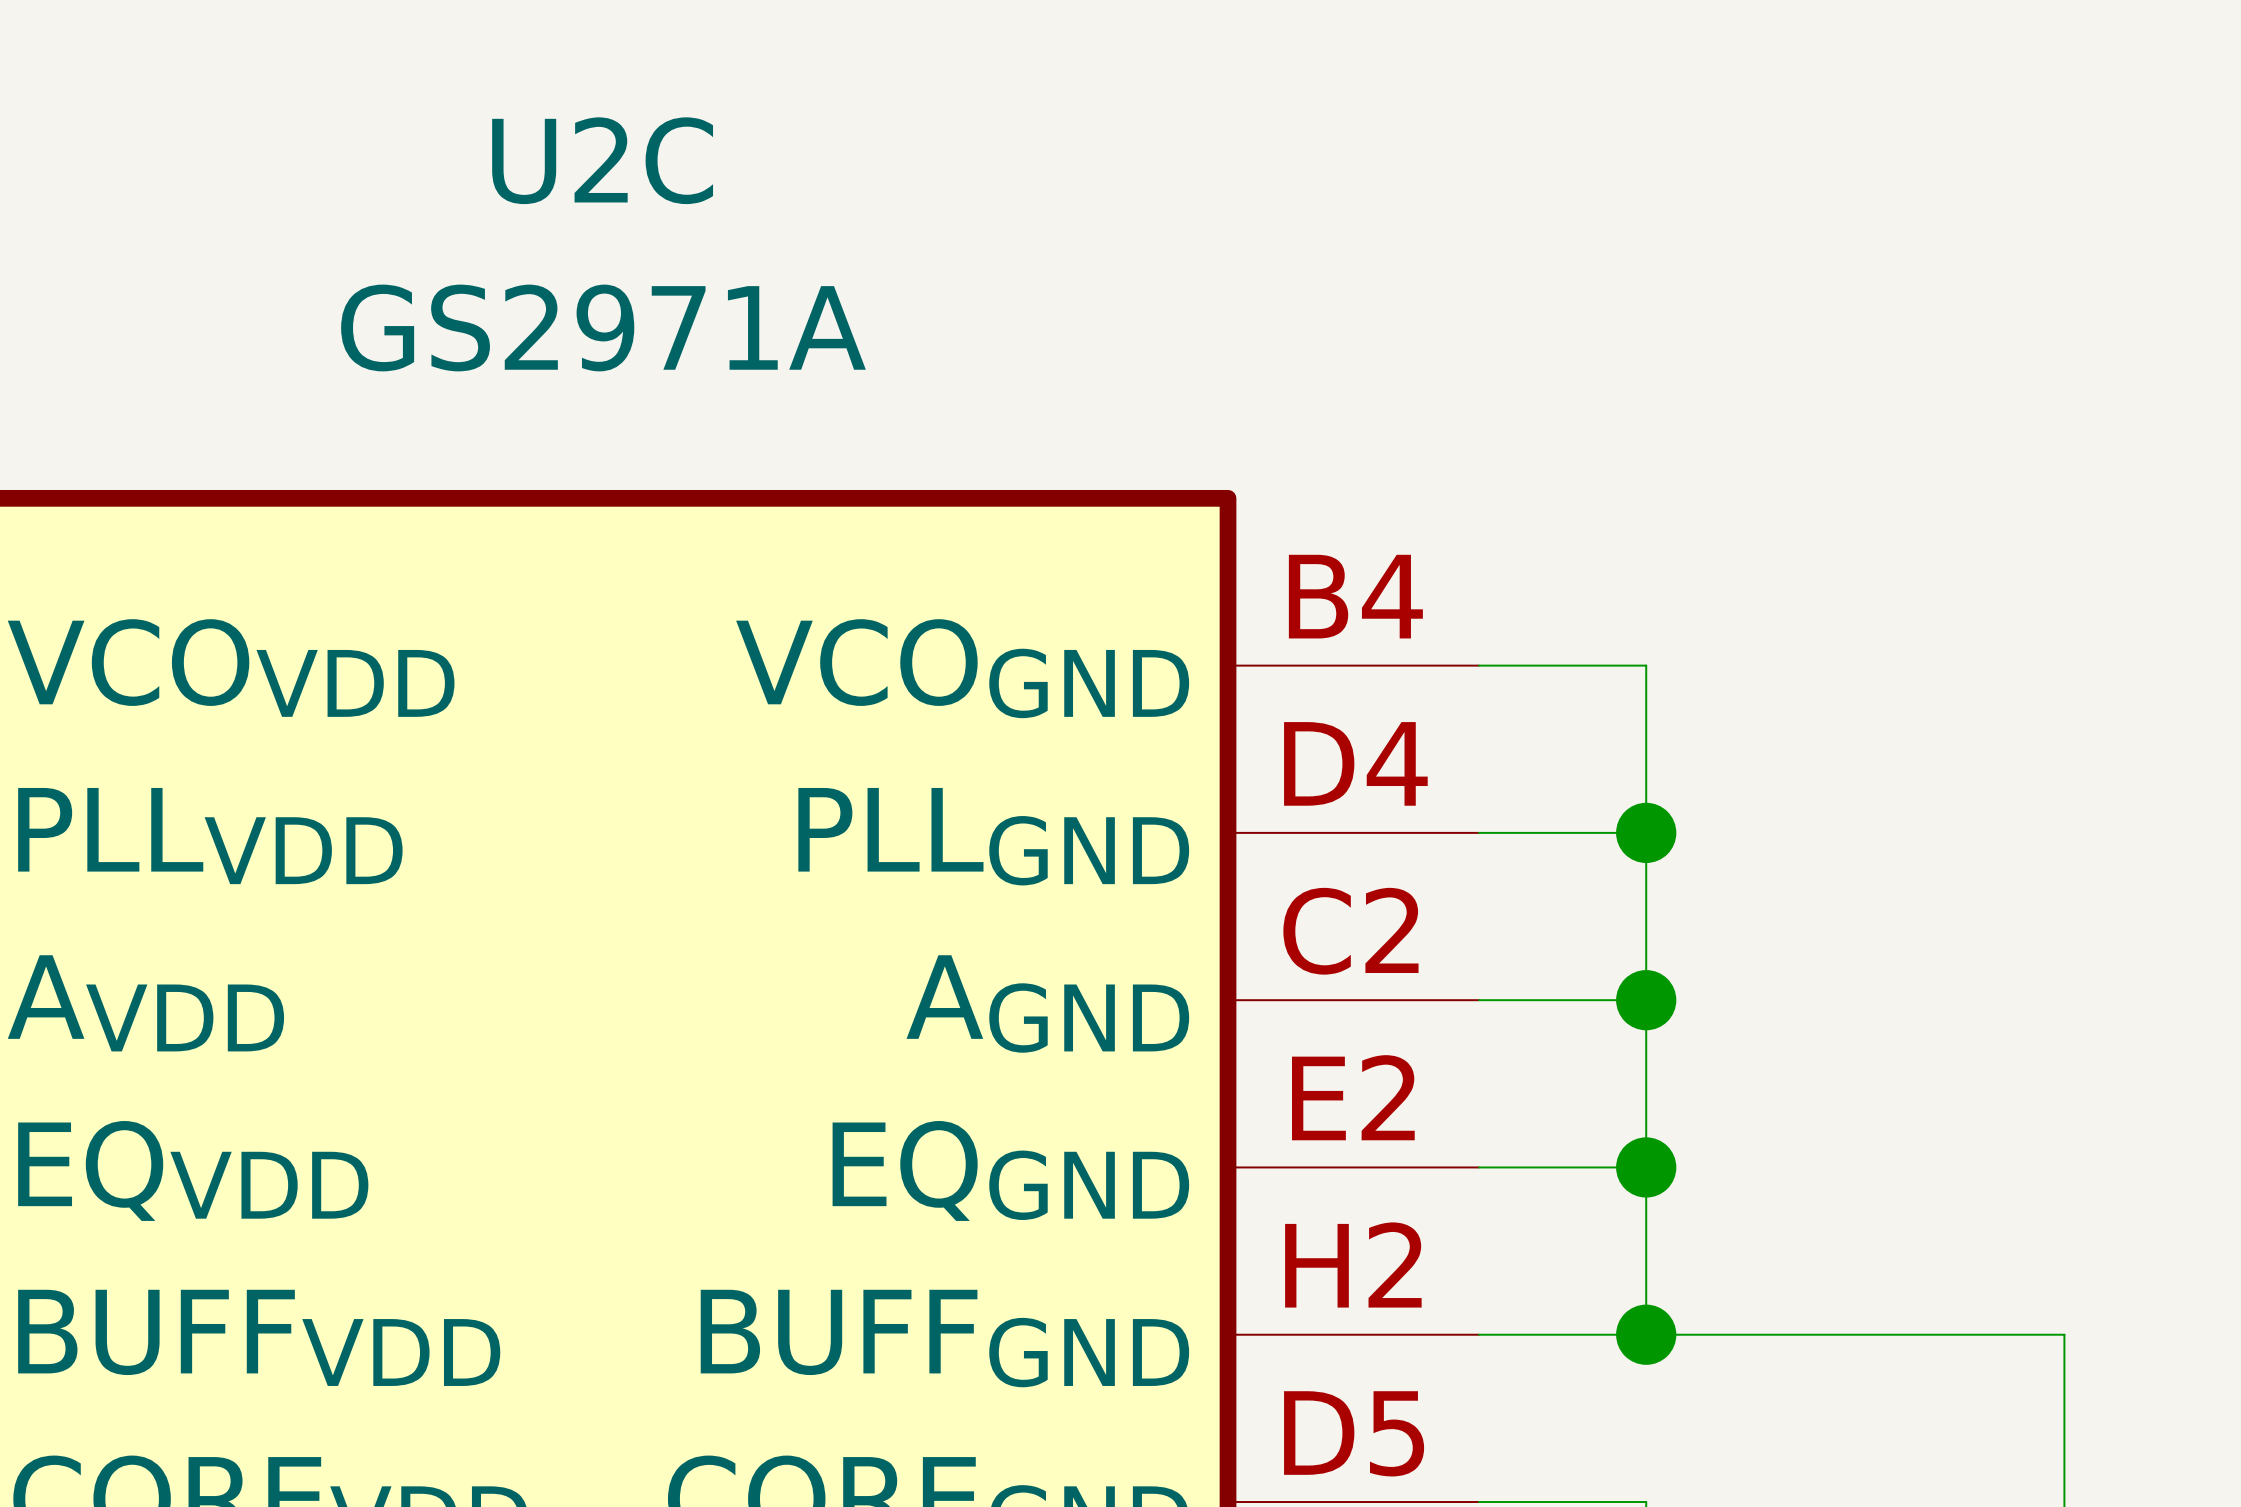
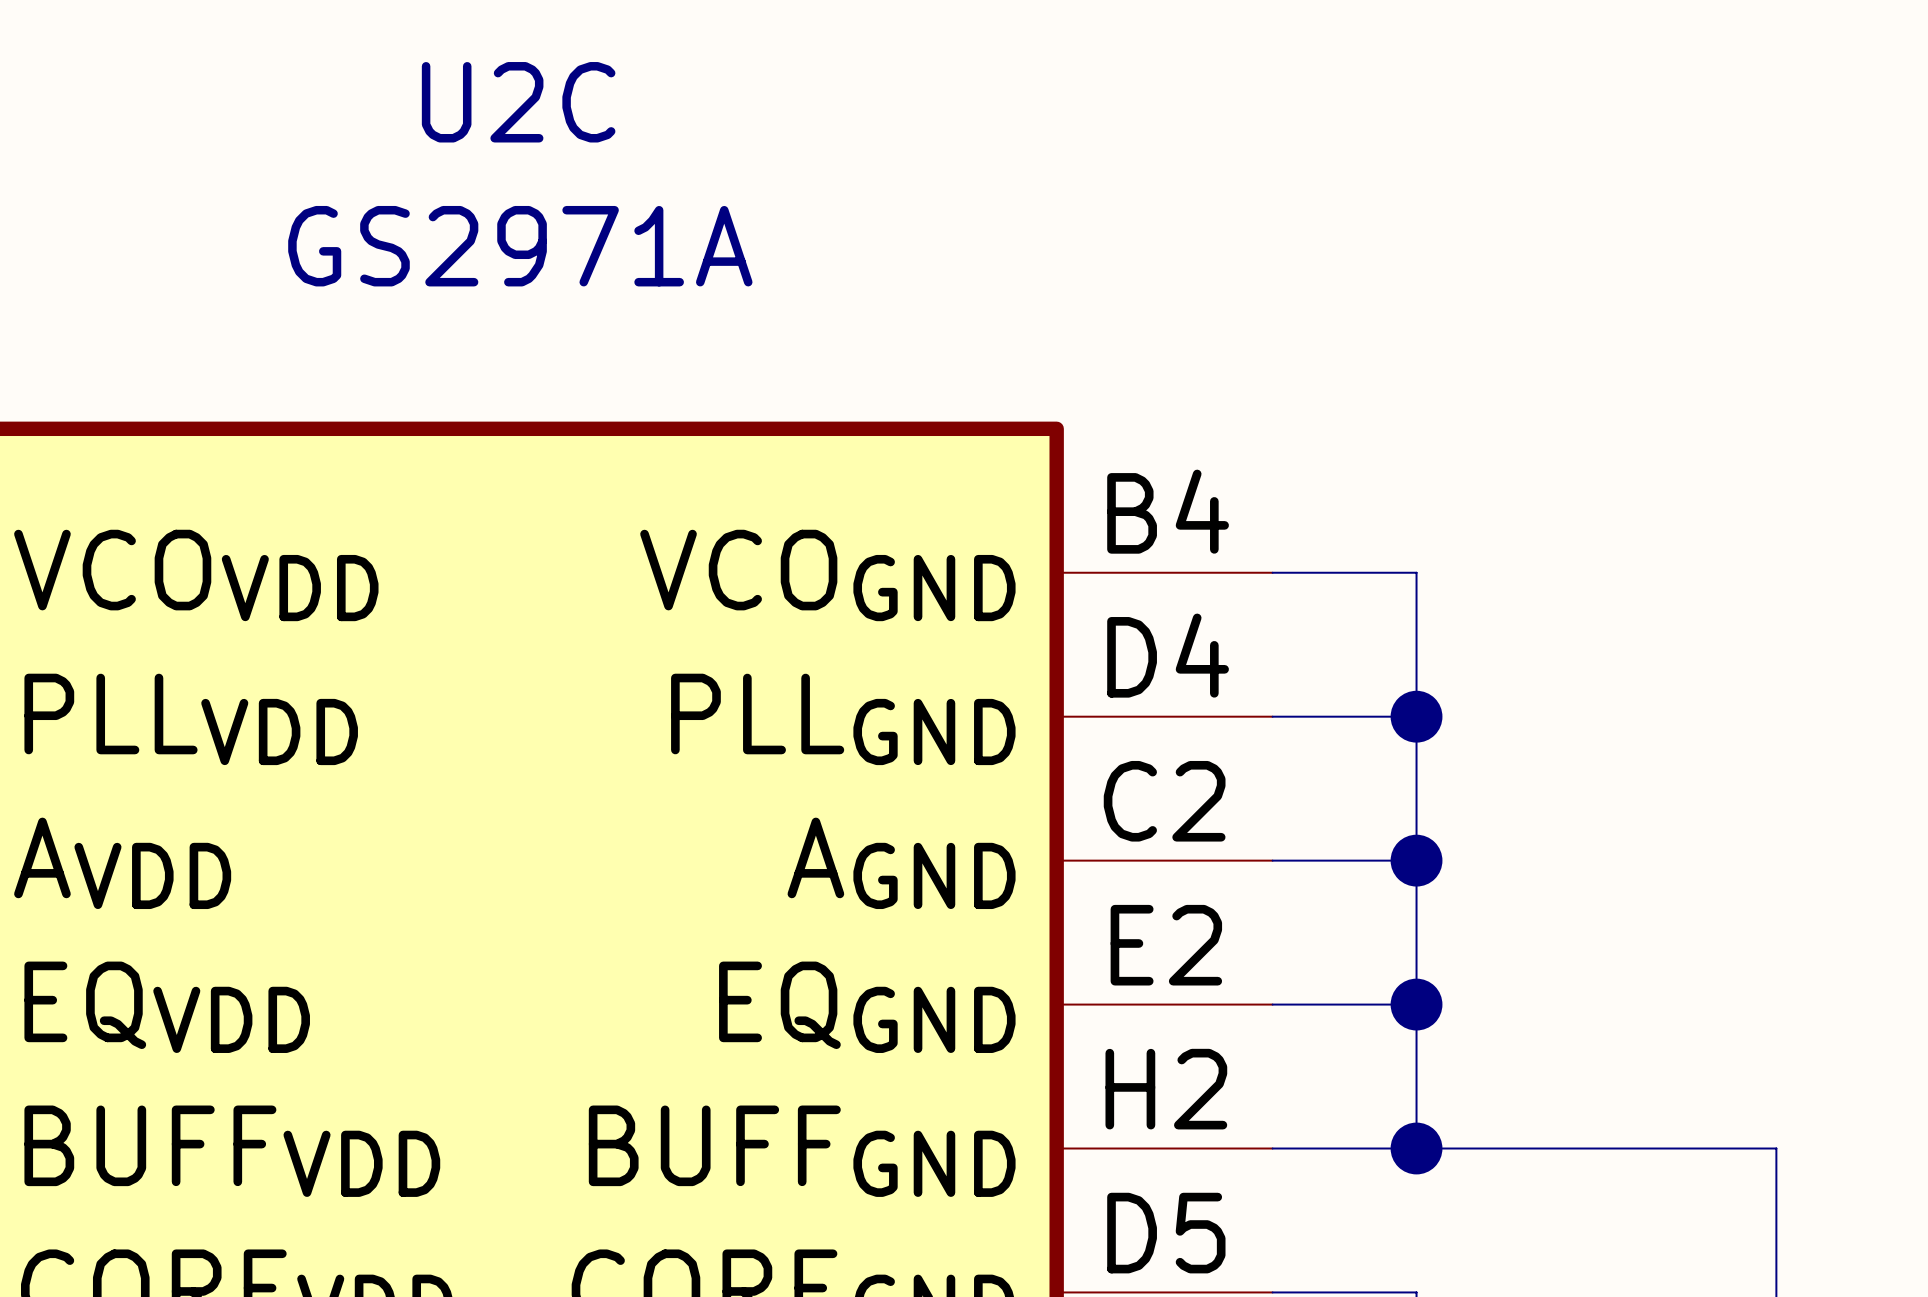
U2C name position: U2C (602, 160) -> U2C (518, 102)
U2C value position: GS2971A (603, 328) -> GS2971A (520, 246)

